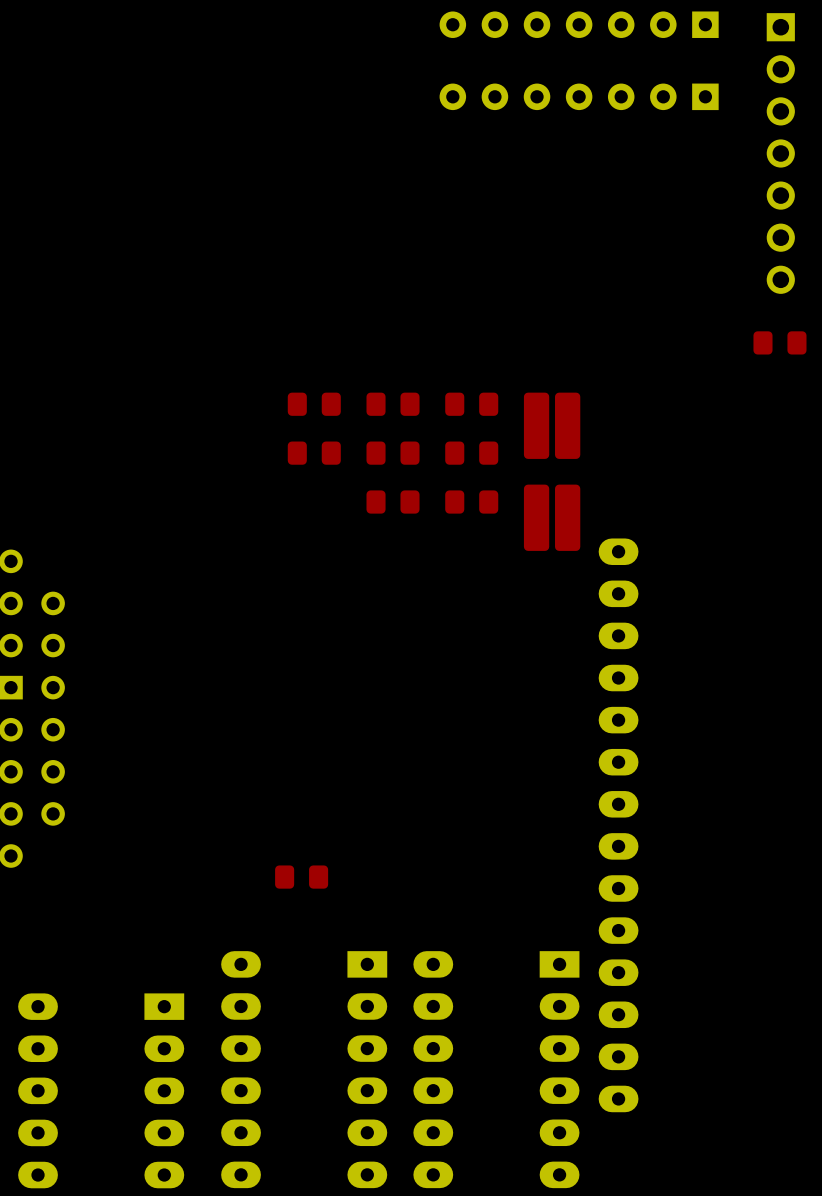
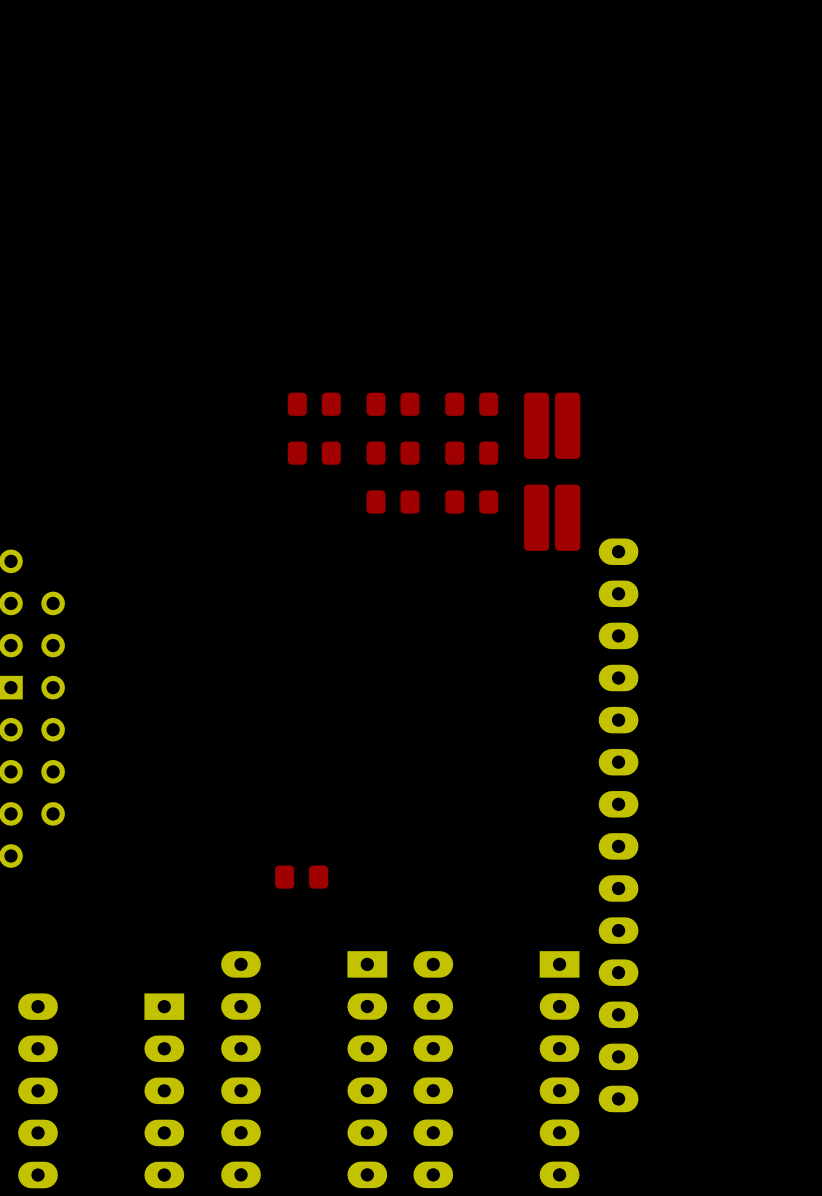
part: (579, 24) -> none
part: (579, 96) -> none
part: (780, 153) -> none
part: (779, 342) -> none

